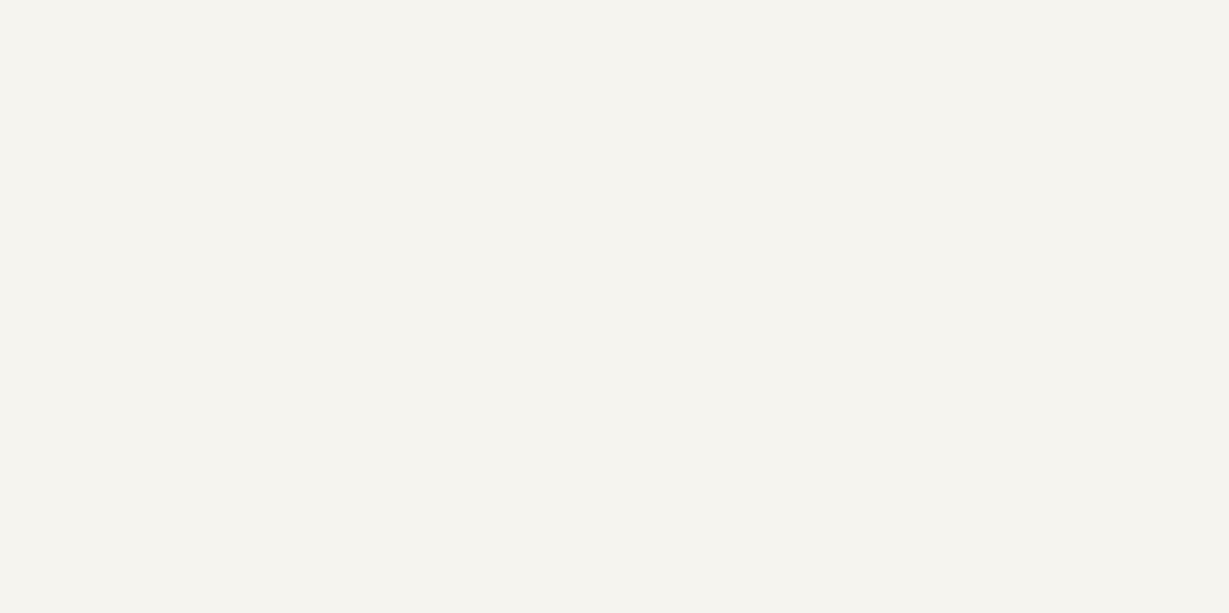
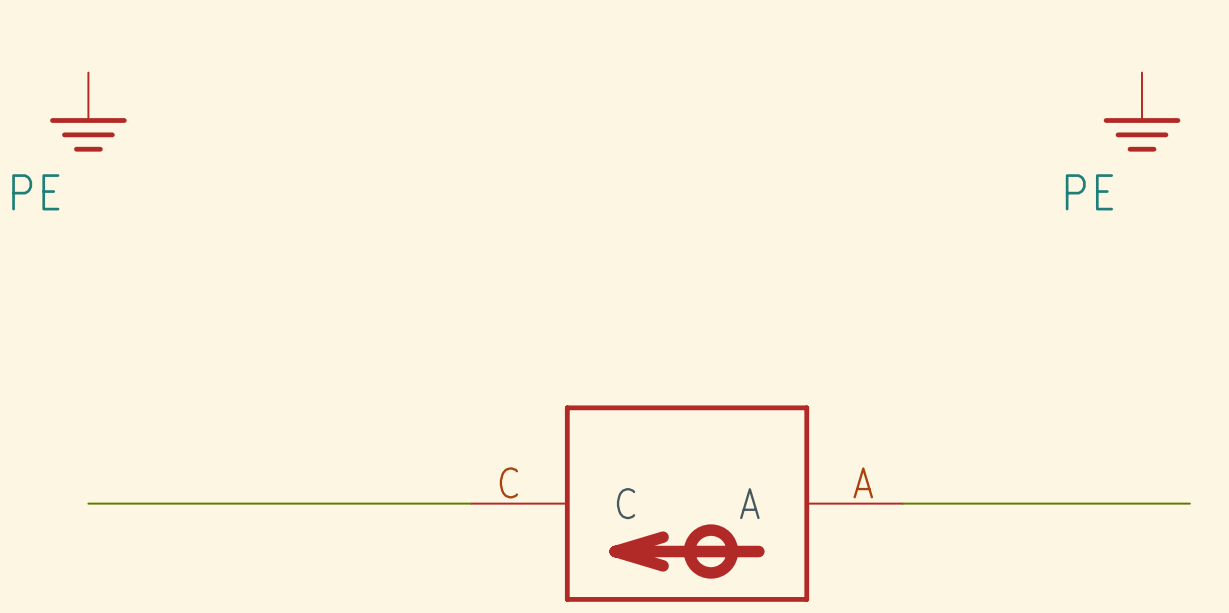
power symbol: none -> PE (88, 112)
power symbol: none -> PE (1141, 112)
wire: none -> (88, 503) (471, 503)
part: none -> (687, 503)
wire: none -> (902, 503) (1189, 503)

